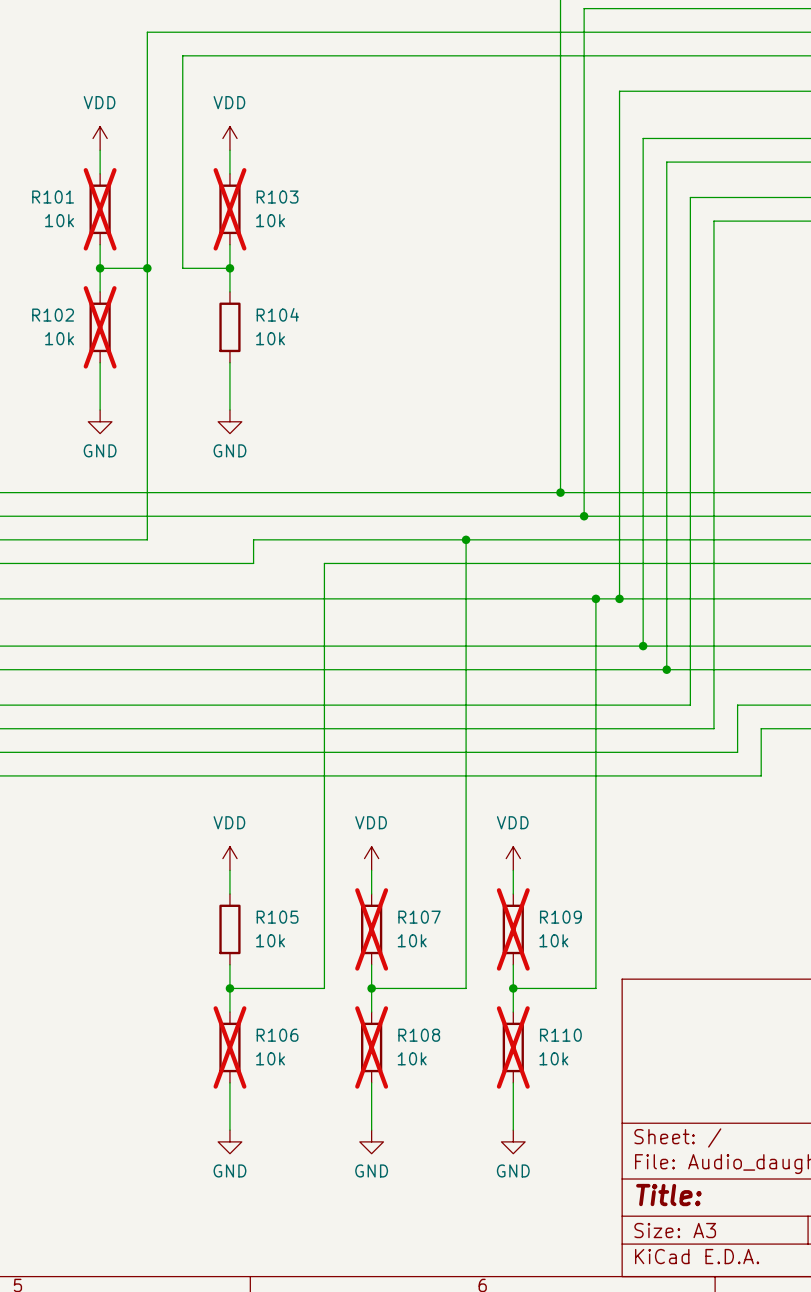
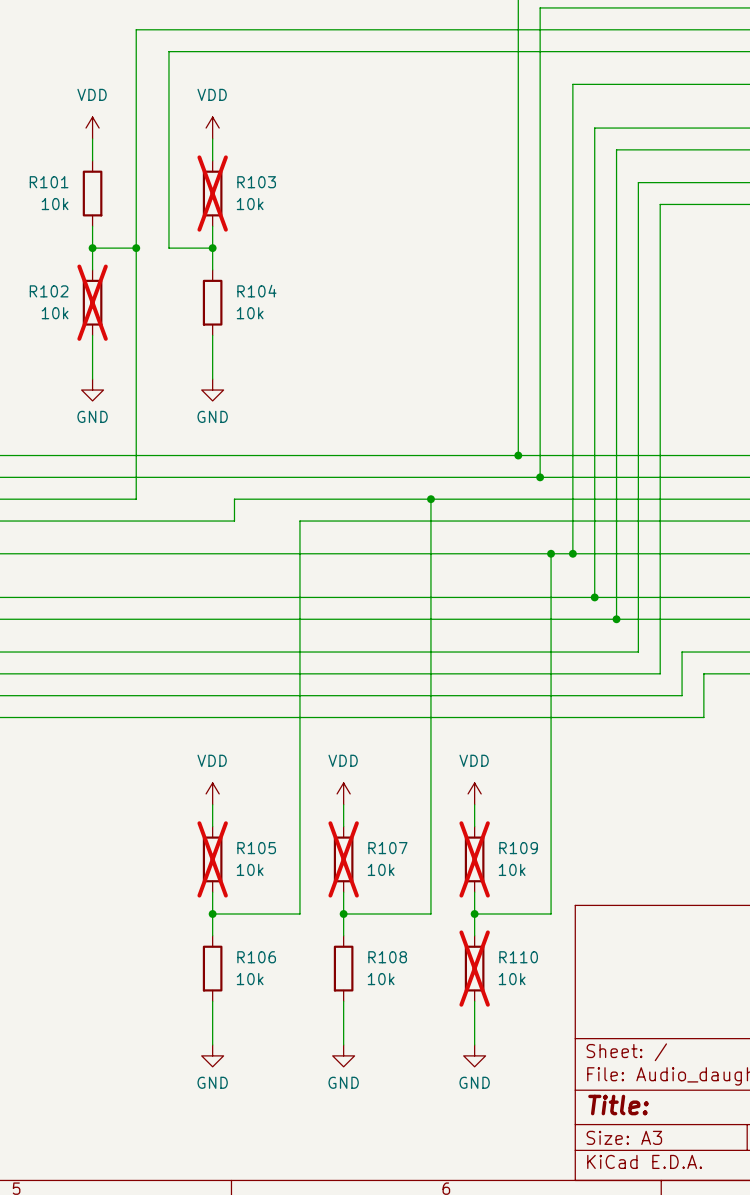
R101 do-not-place cross: (100, 209) -> none
R105 do-not-place cross: none -> (212, 859)
R106 do-not-place cross: (229, 1047) -> none
R108 do-not-place cross: (371, 1047) -> none

